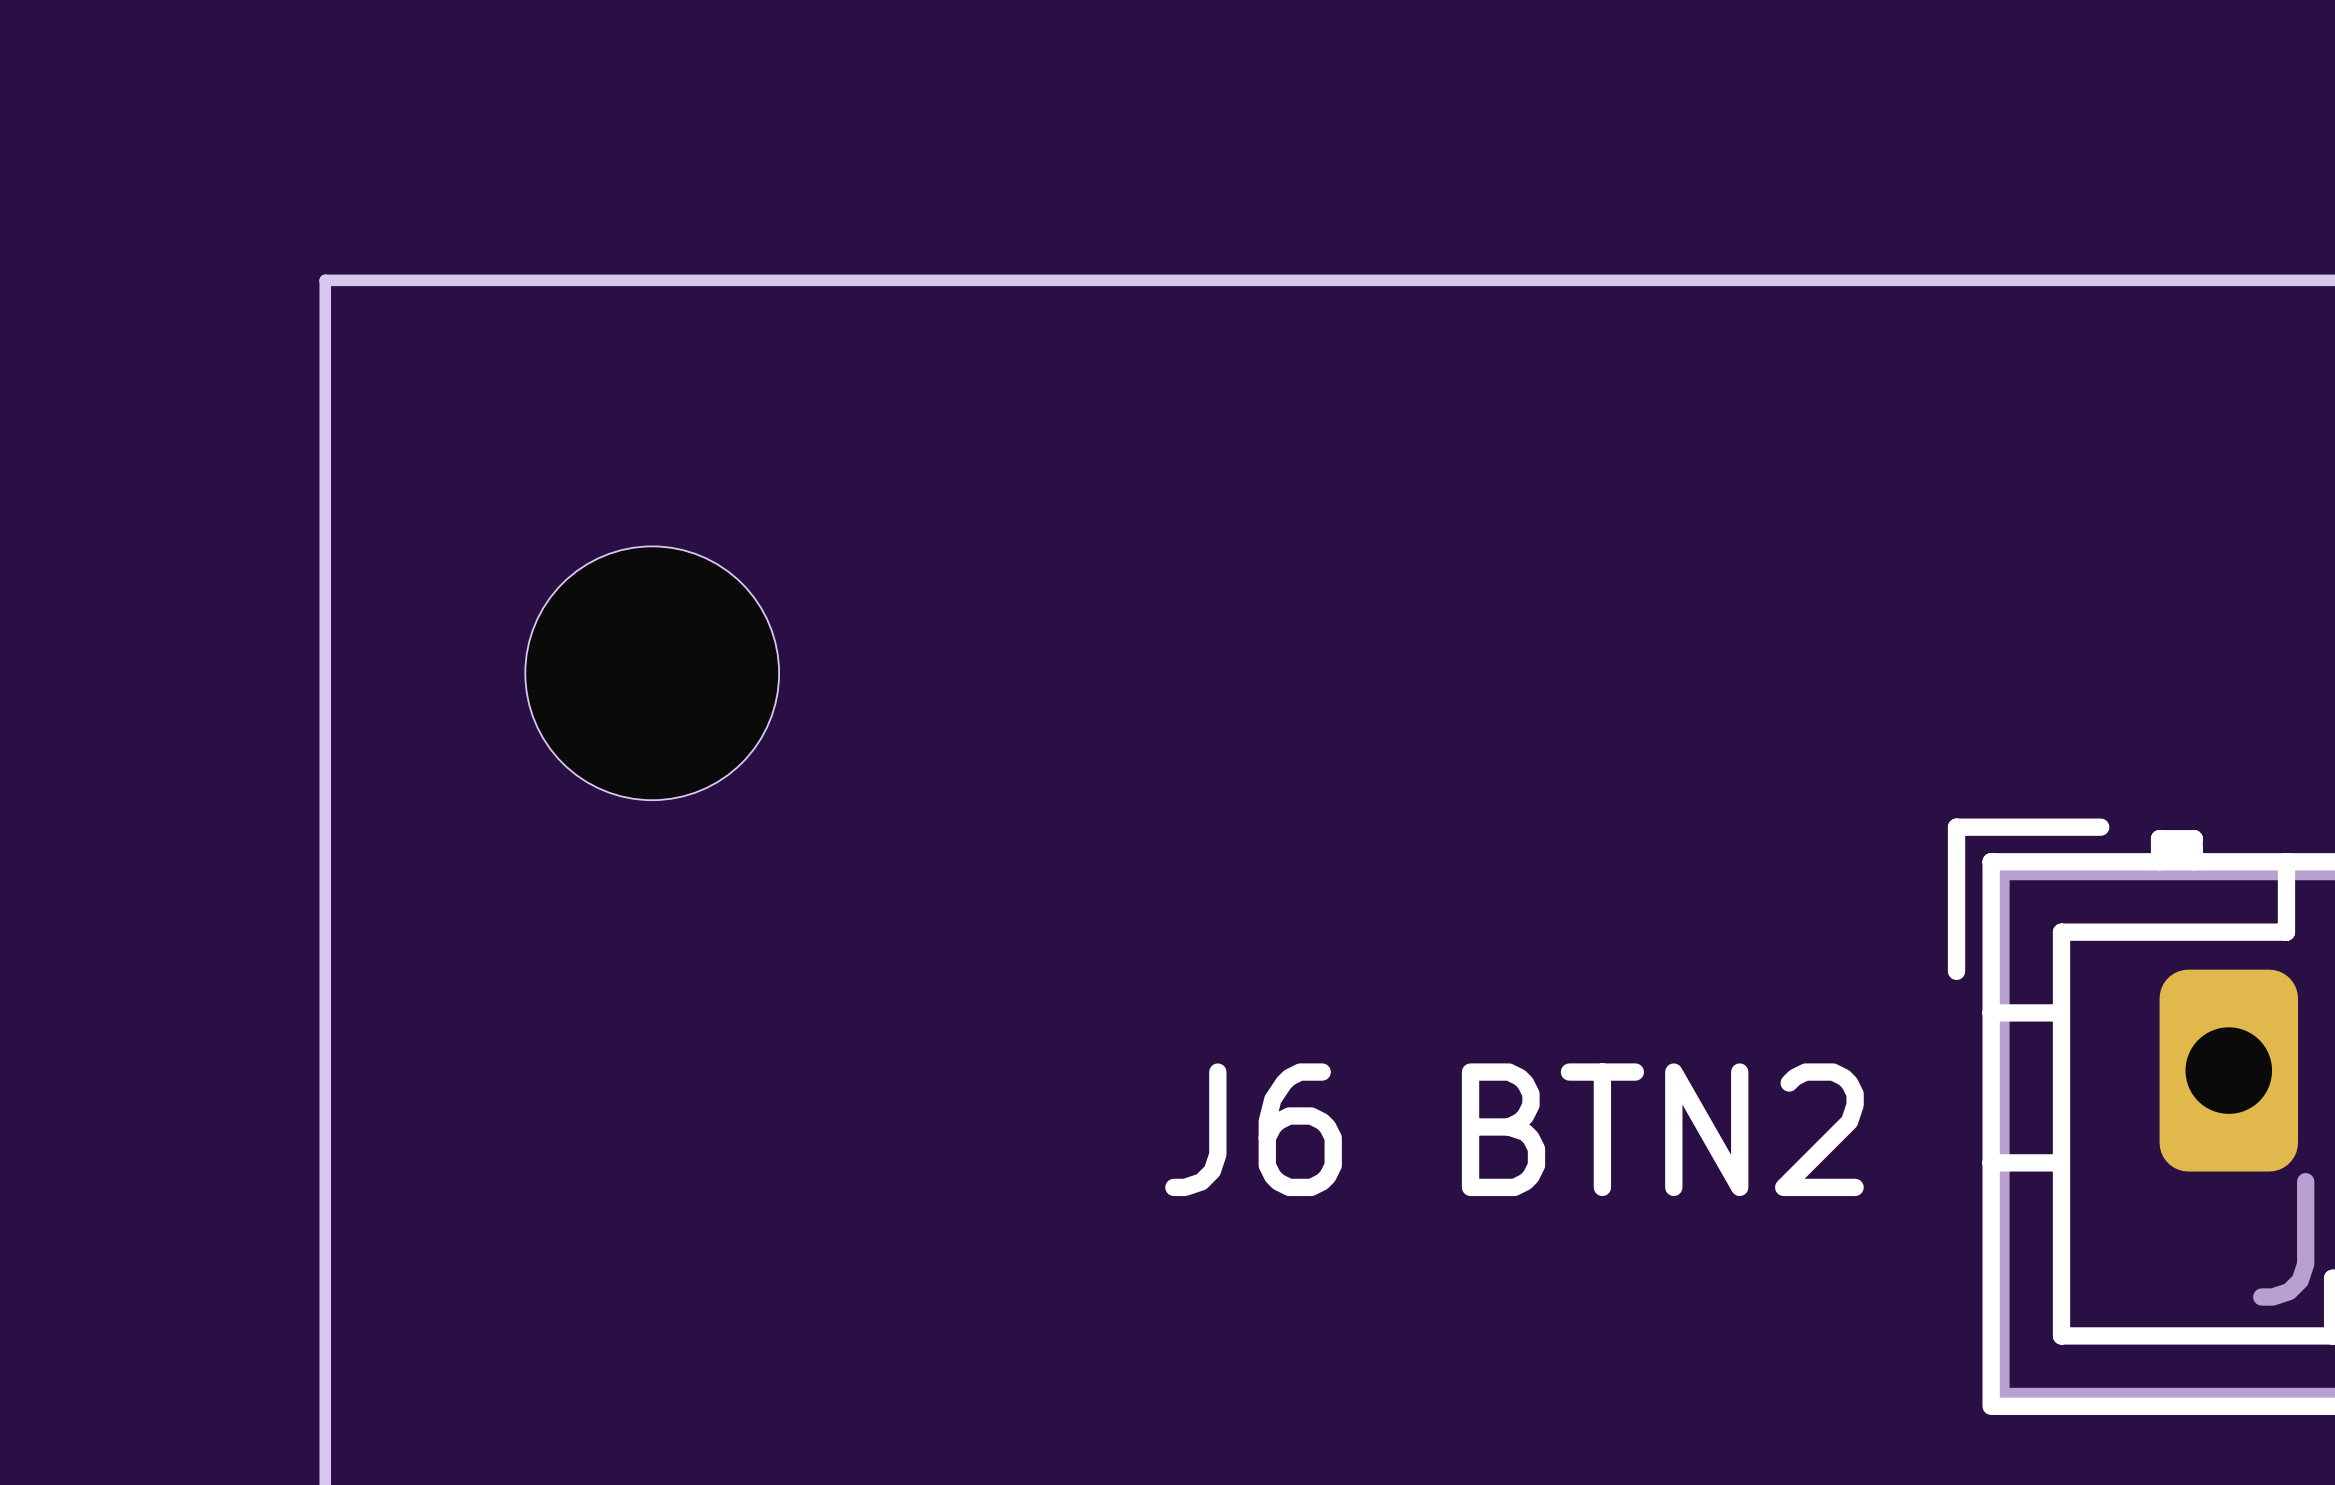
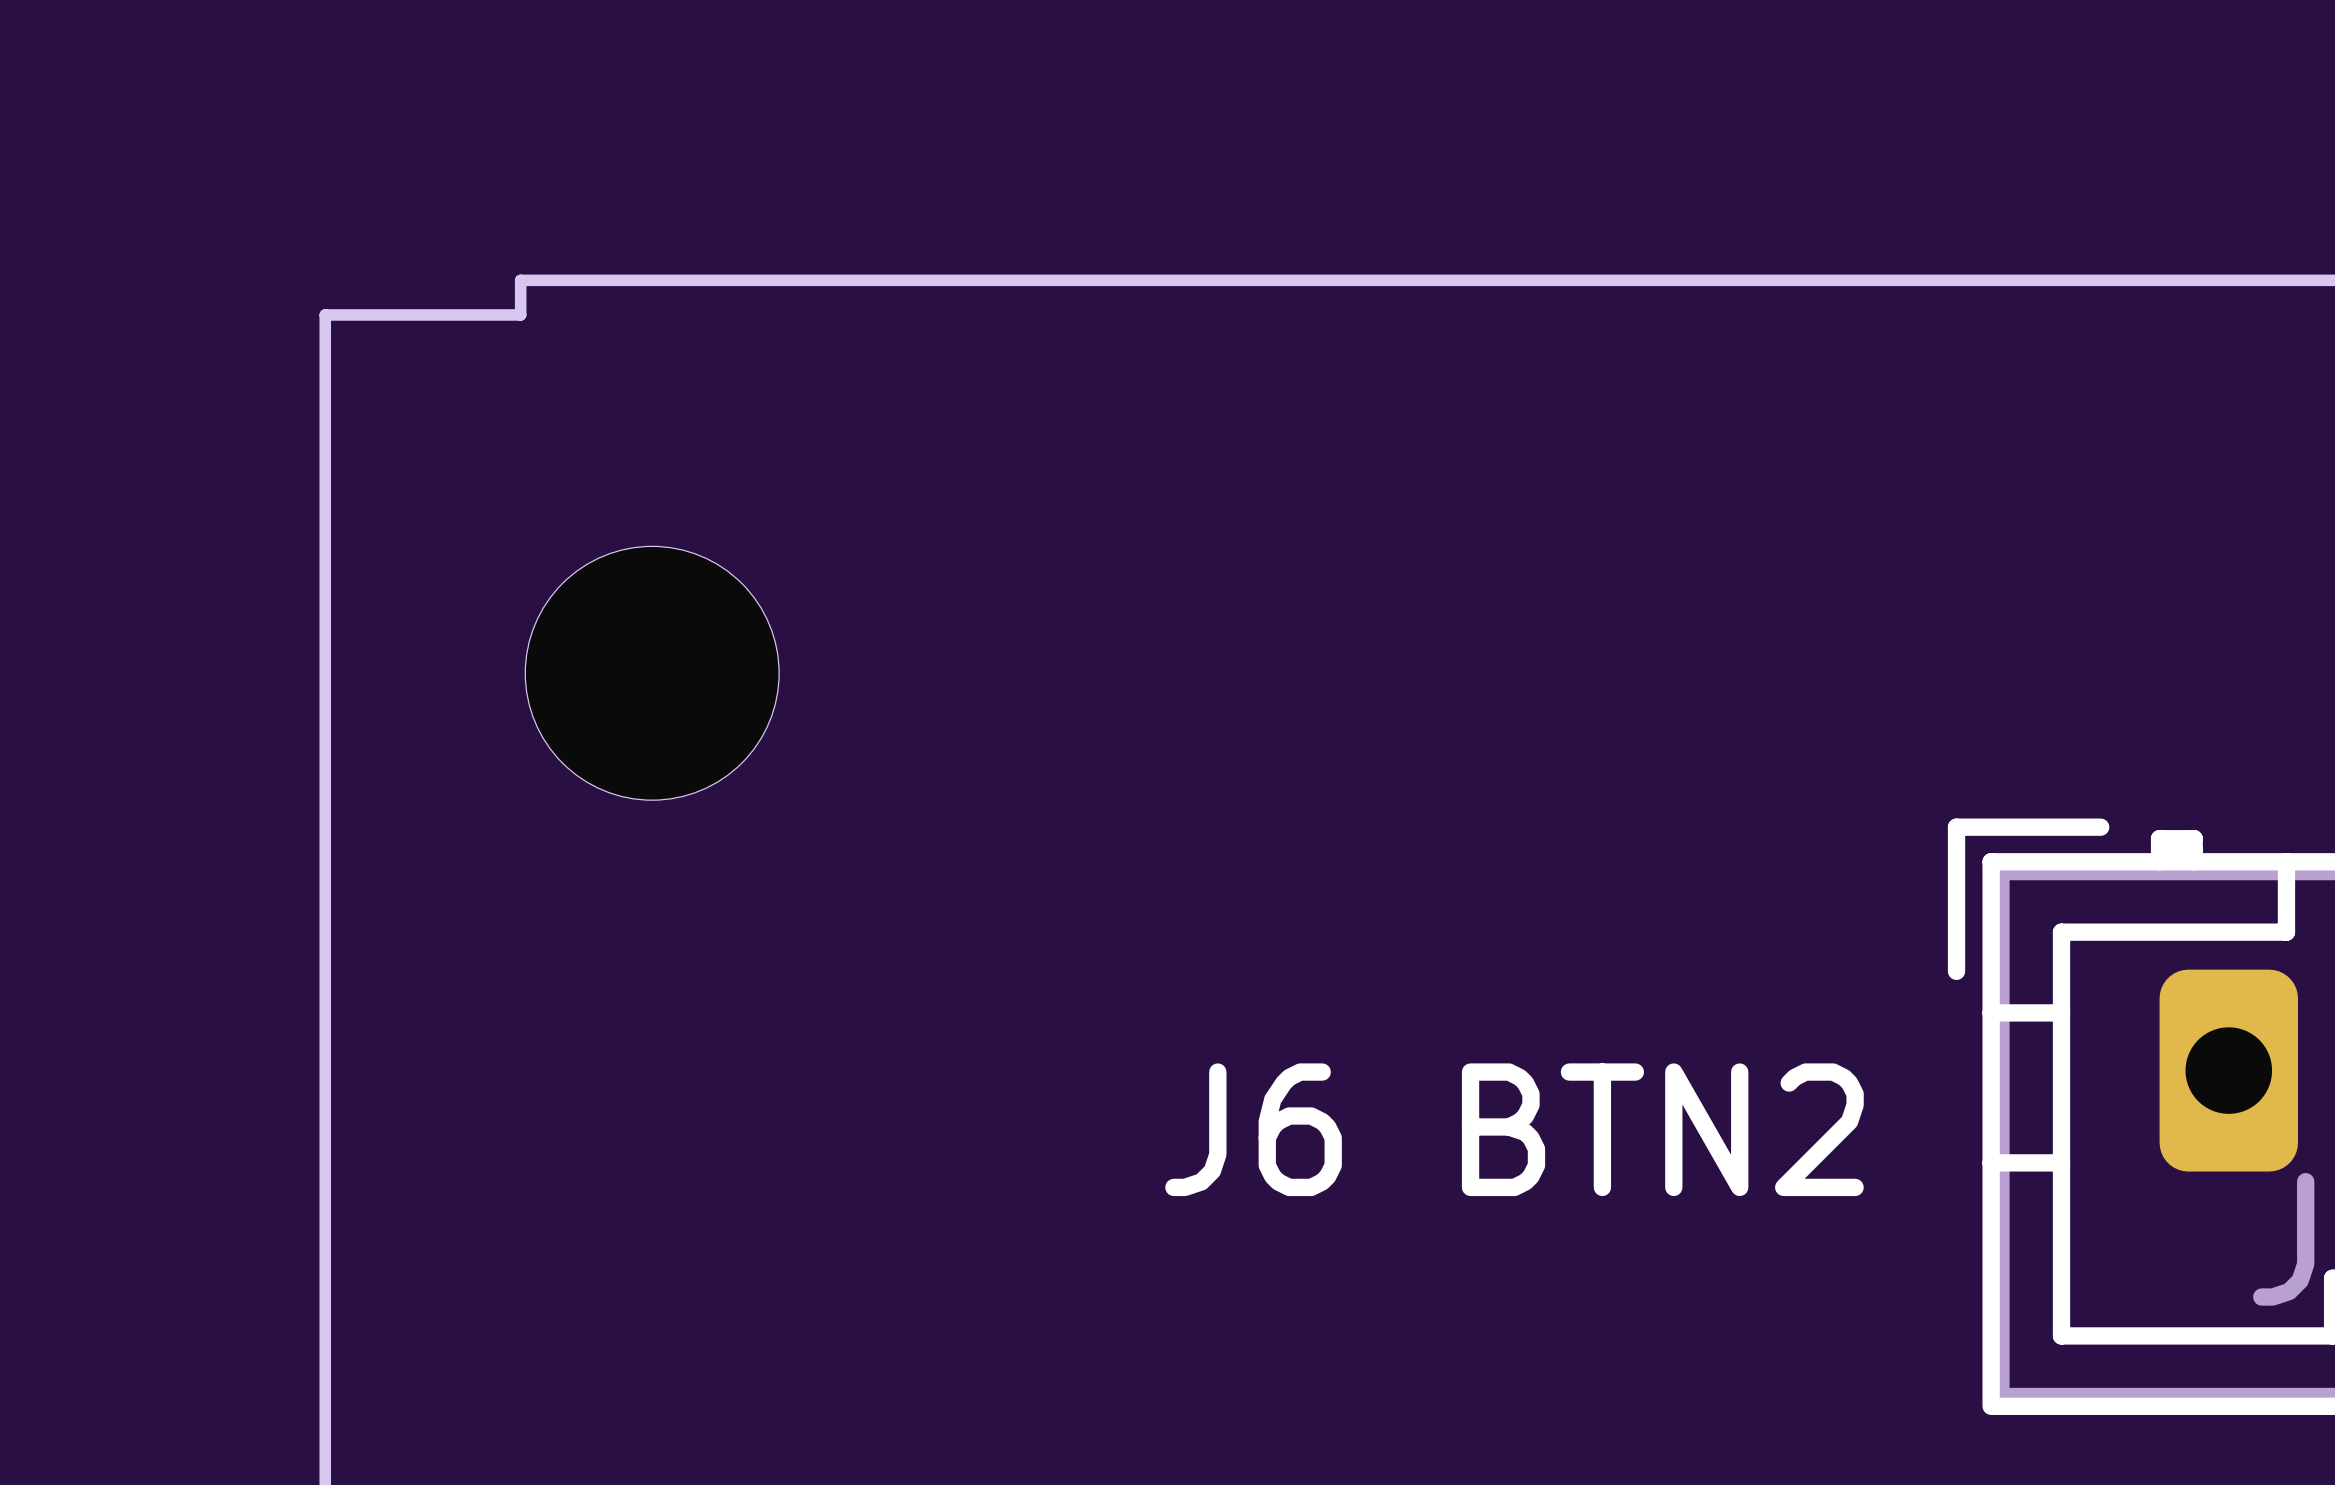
board edge: (520, 280) (325, 280) (325, 314) -> (520, 280) (520, 314) (325, 314)

